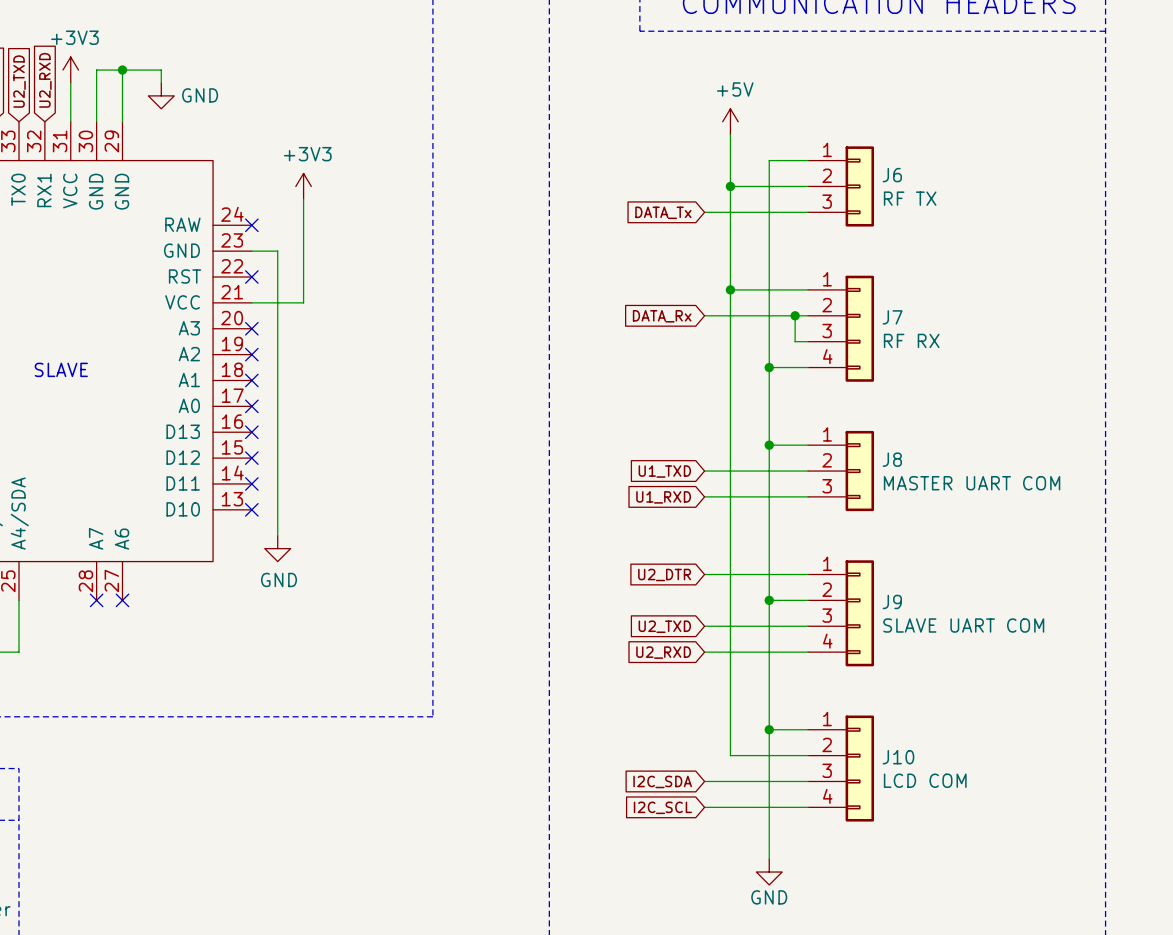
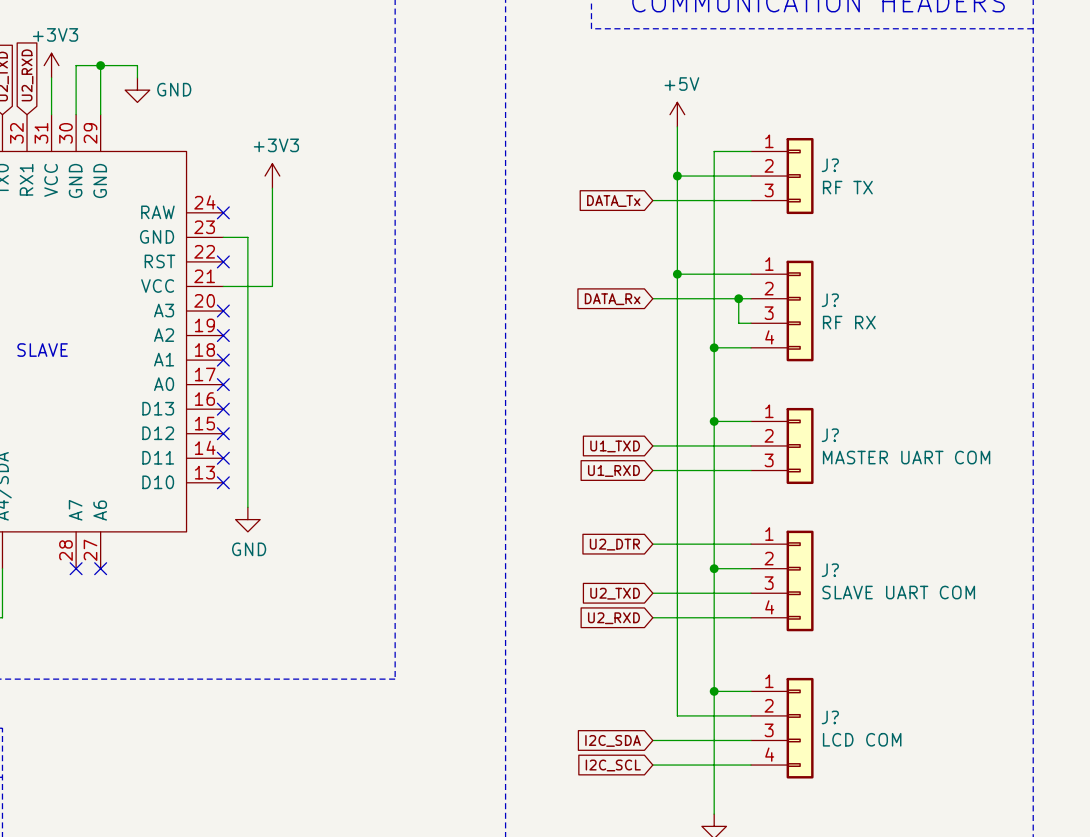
J6 name: J6 (892, 175) -> J? (830, 165)
J7 name: J7 (892, 317) -> J? (830, 300)
J8 name: J8 (892, 459) -> J? (830, 435)
J9 name: J9 (892, 601) -> J? (830, 570)
J10 name: J10 (898, 757) -> J? (830, 717)

